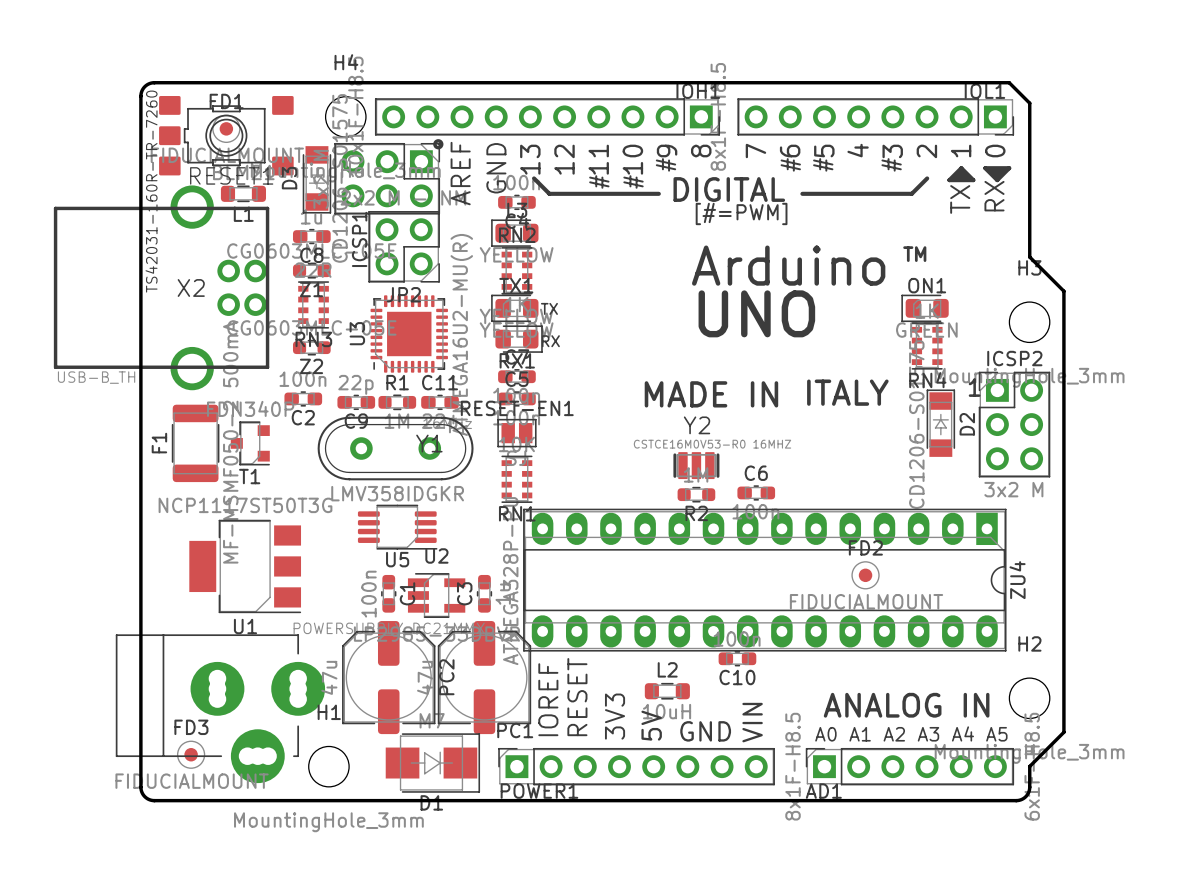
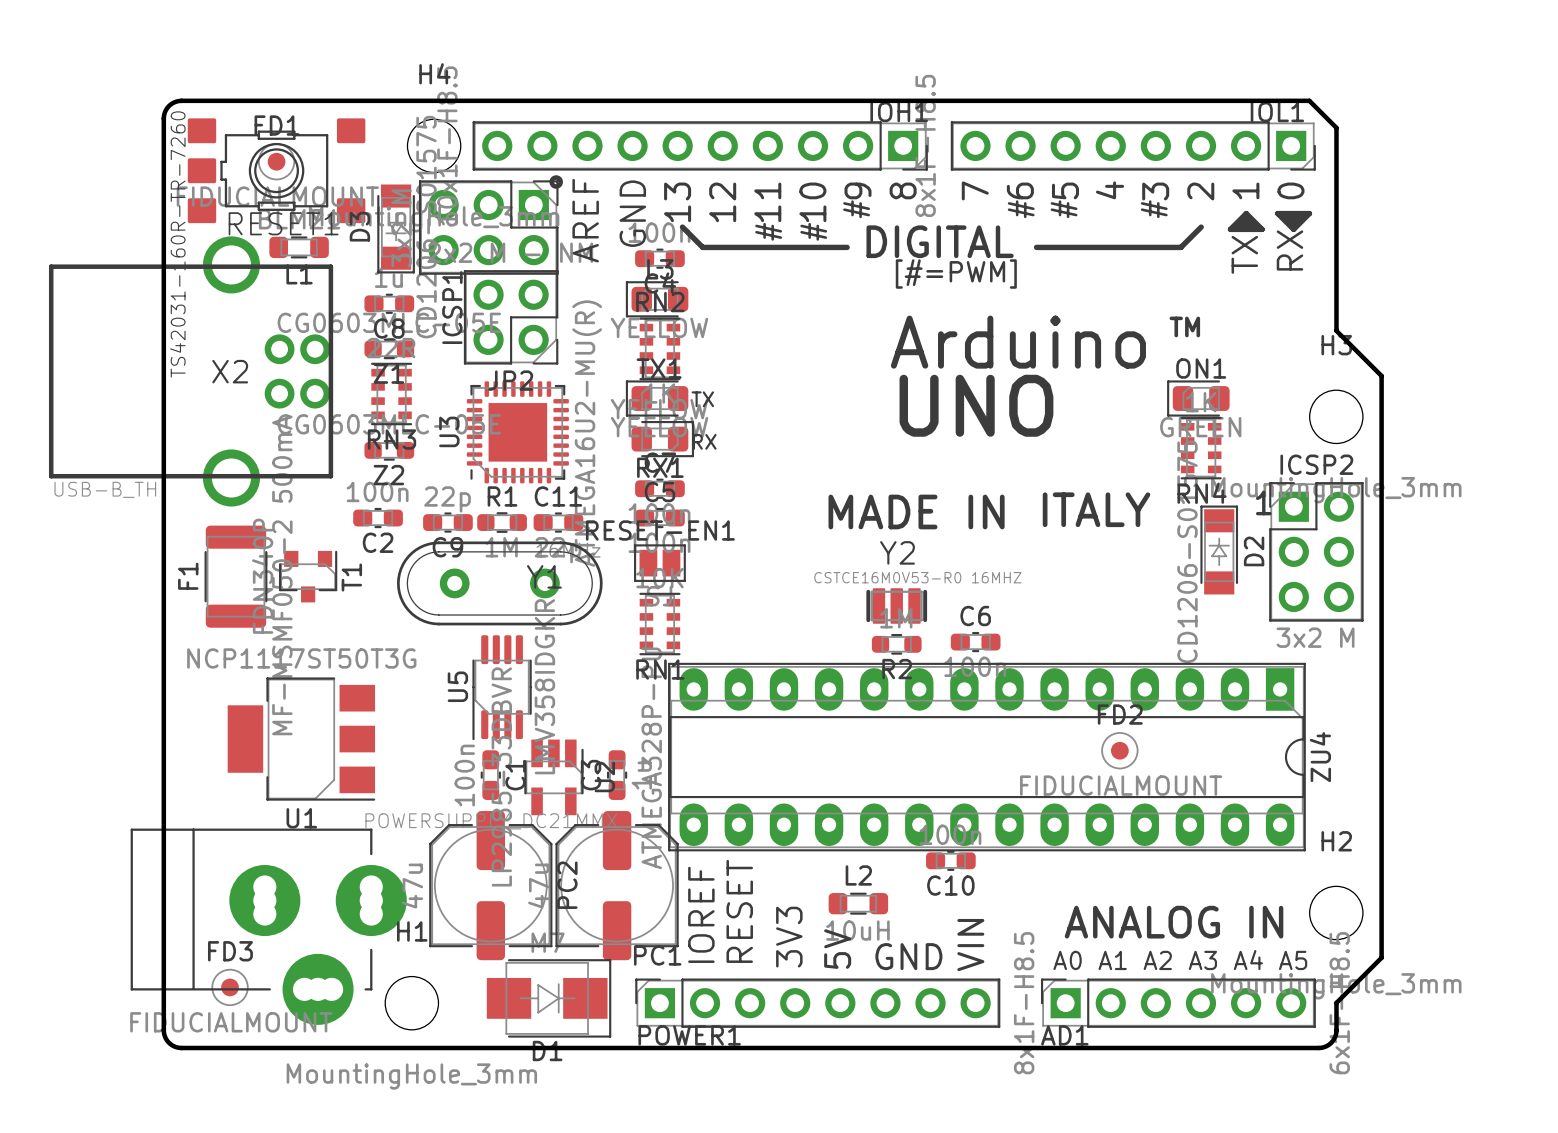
T1 rotation: 0° (250, 443) -> 90° counterclockwise (308, 576)
U5 rotation: 0° (397, 527) -> 90° clockwise (502, 687)
U2 rotation: 0° (436, 595) -> 90° clockwise (553, 777)

